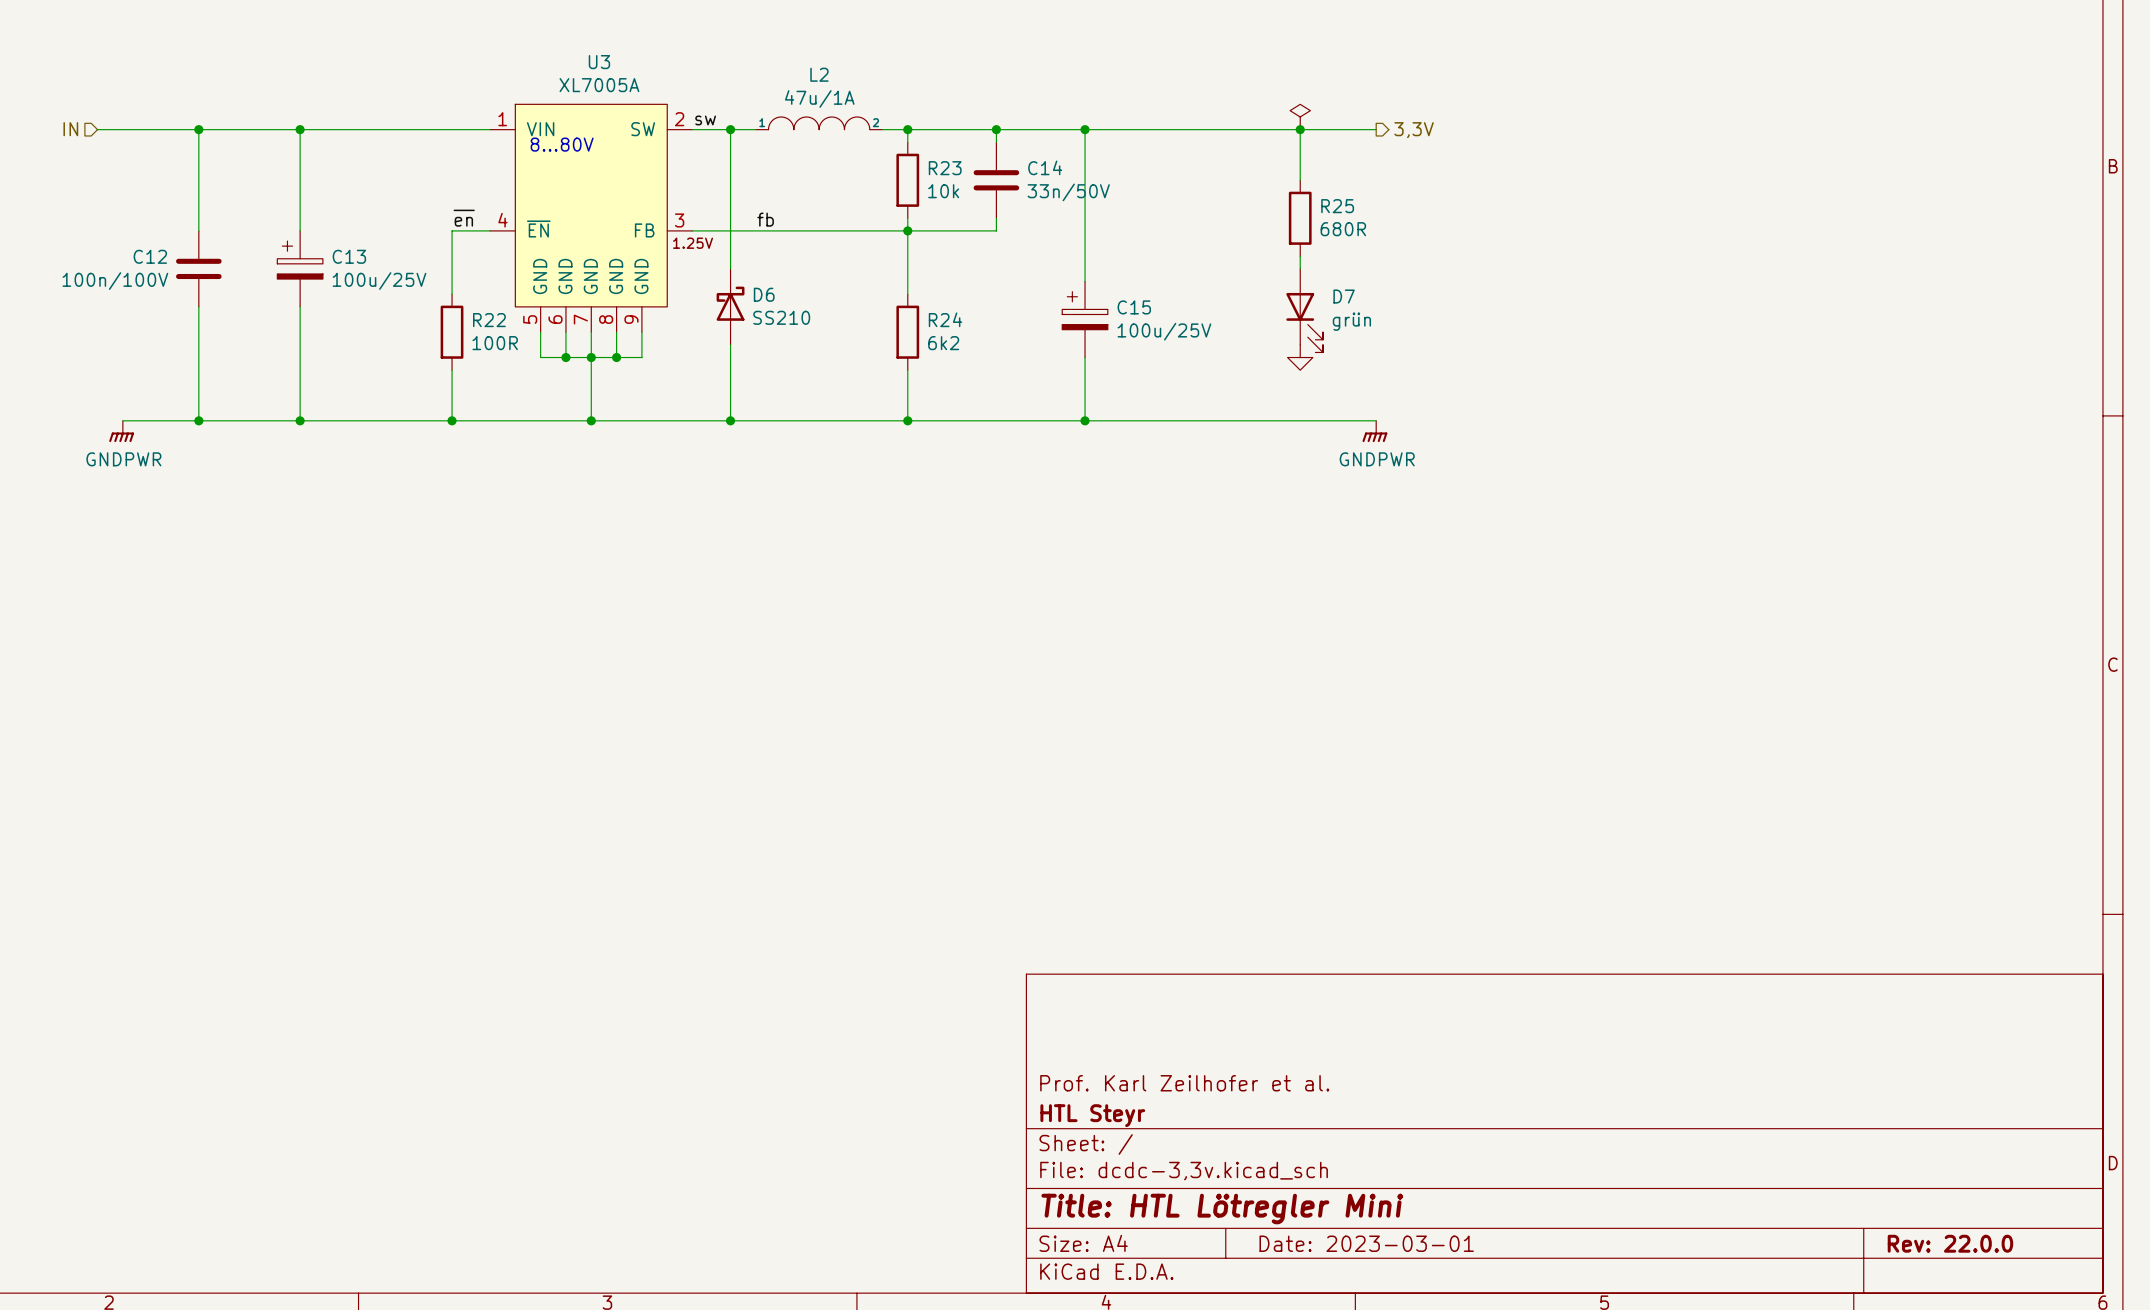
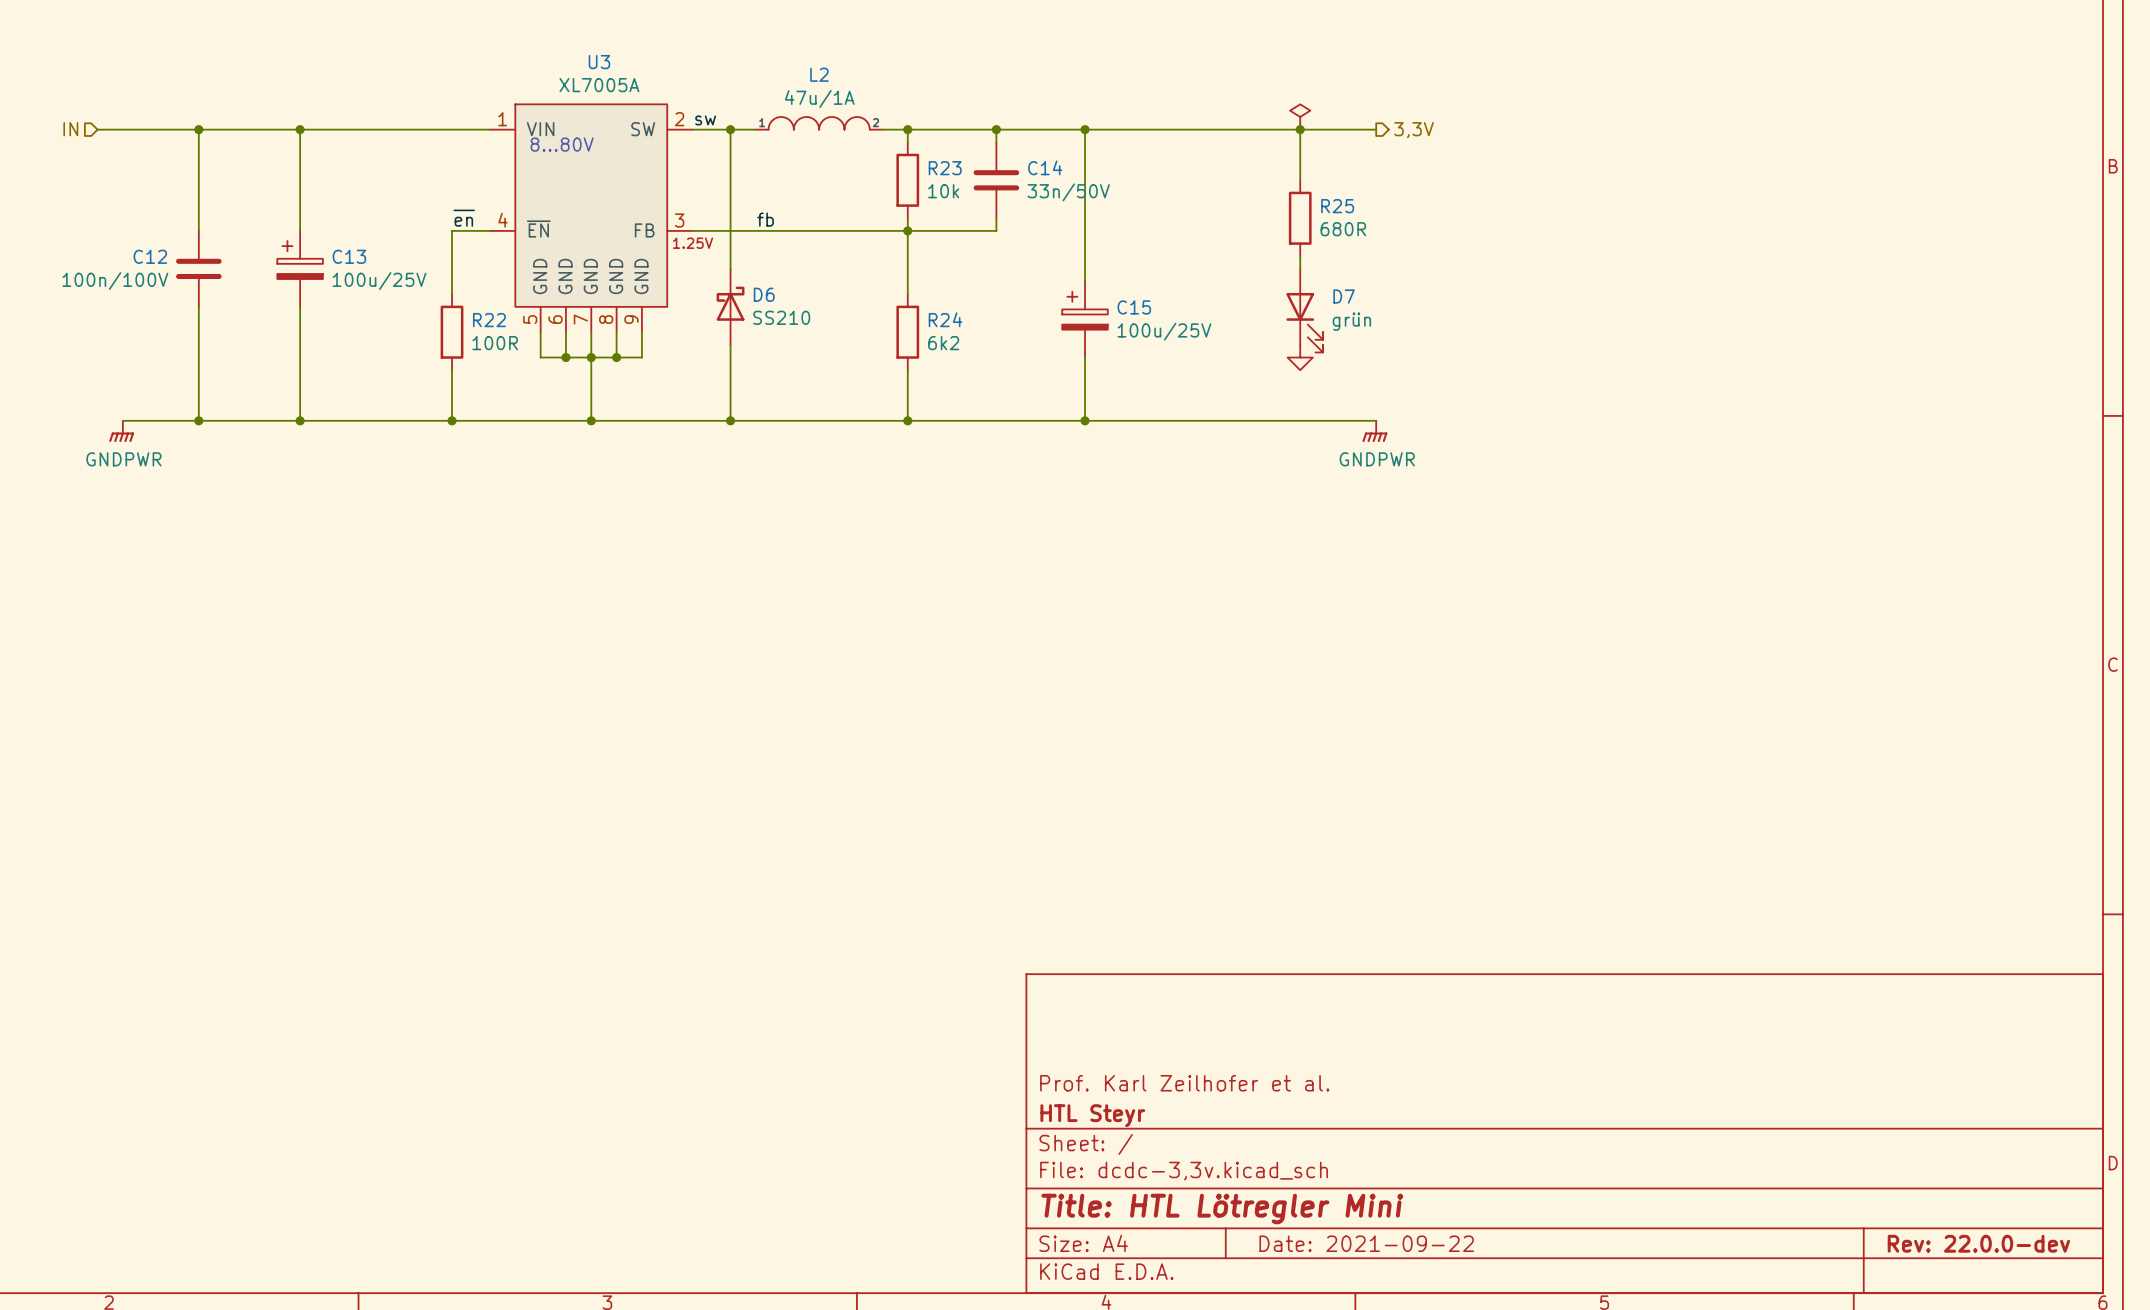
title block: Date: 2023-03-01 (1366, 1243) -> Date: 2021-09-22 (1366, 1243)
title block: Rev: 22.0.0 (1950, 1243) -> Rev: 22.0.0-dev (1978, 1243)

